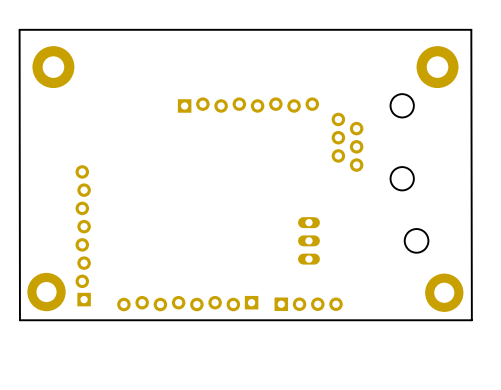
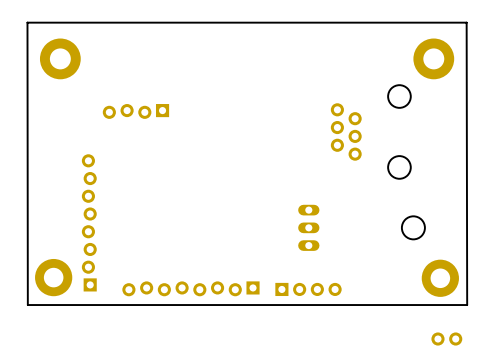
part: (248, 105) -> none
part: none -> (135, 111)
part: none -> (446, 339)

